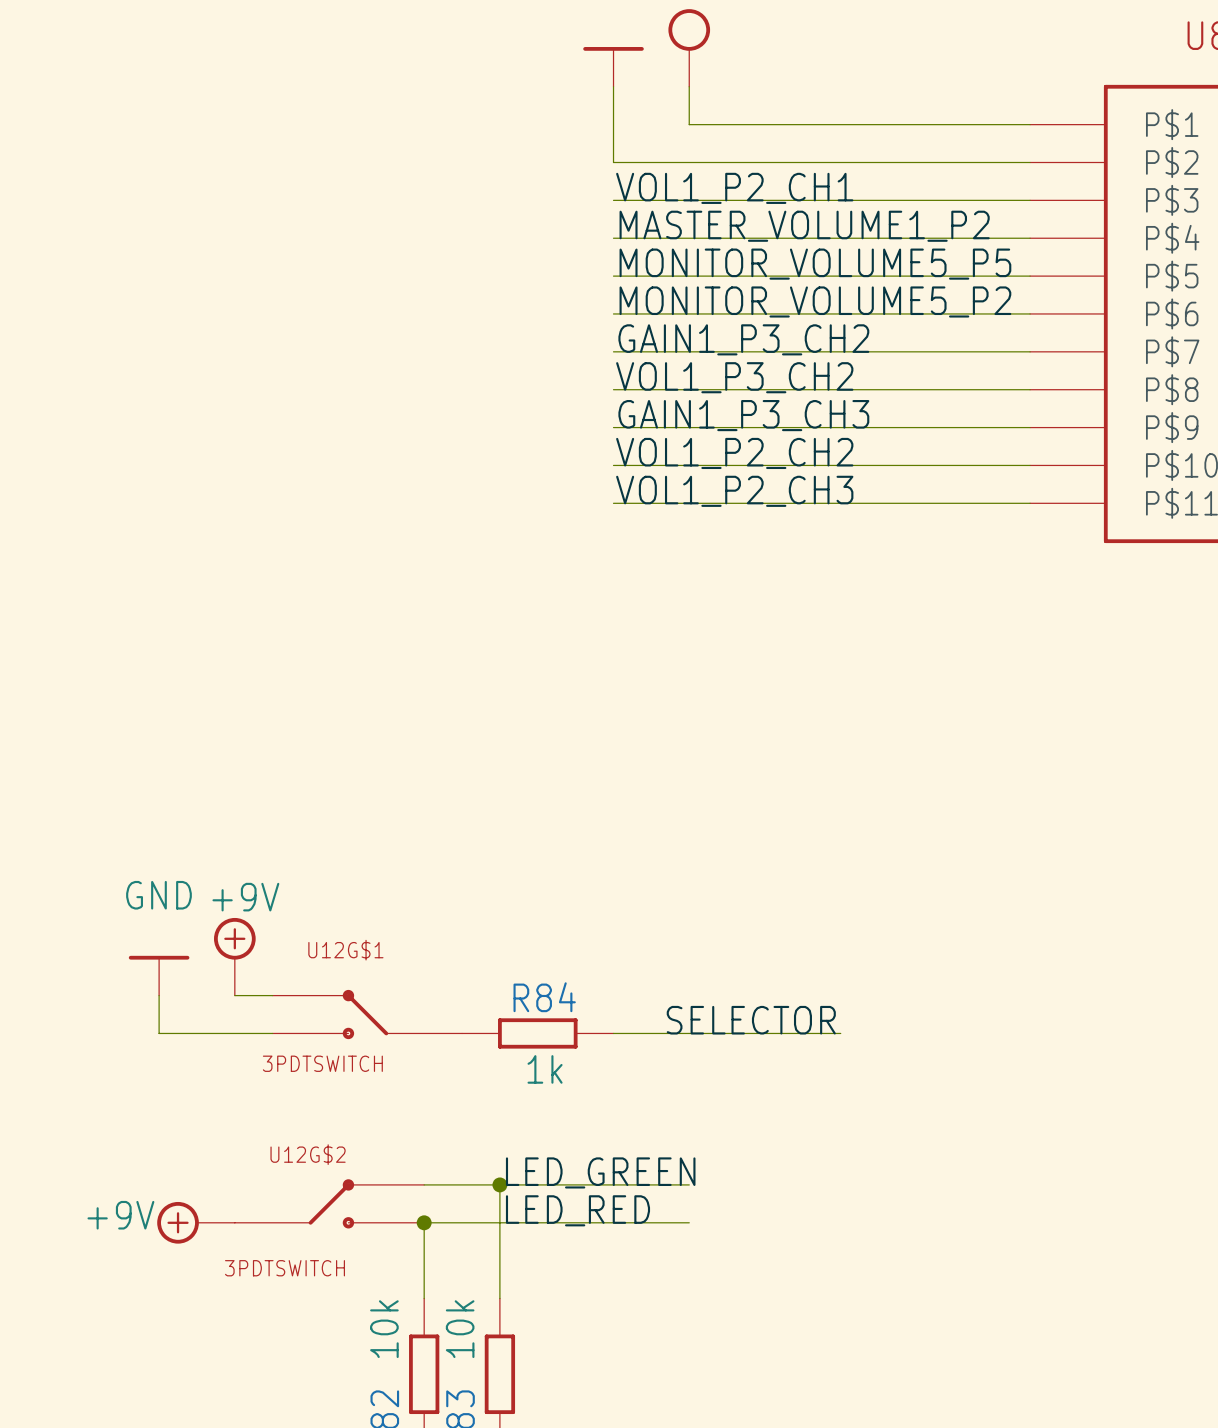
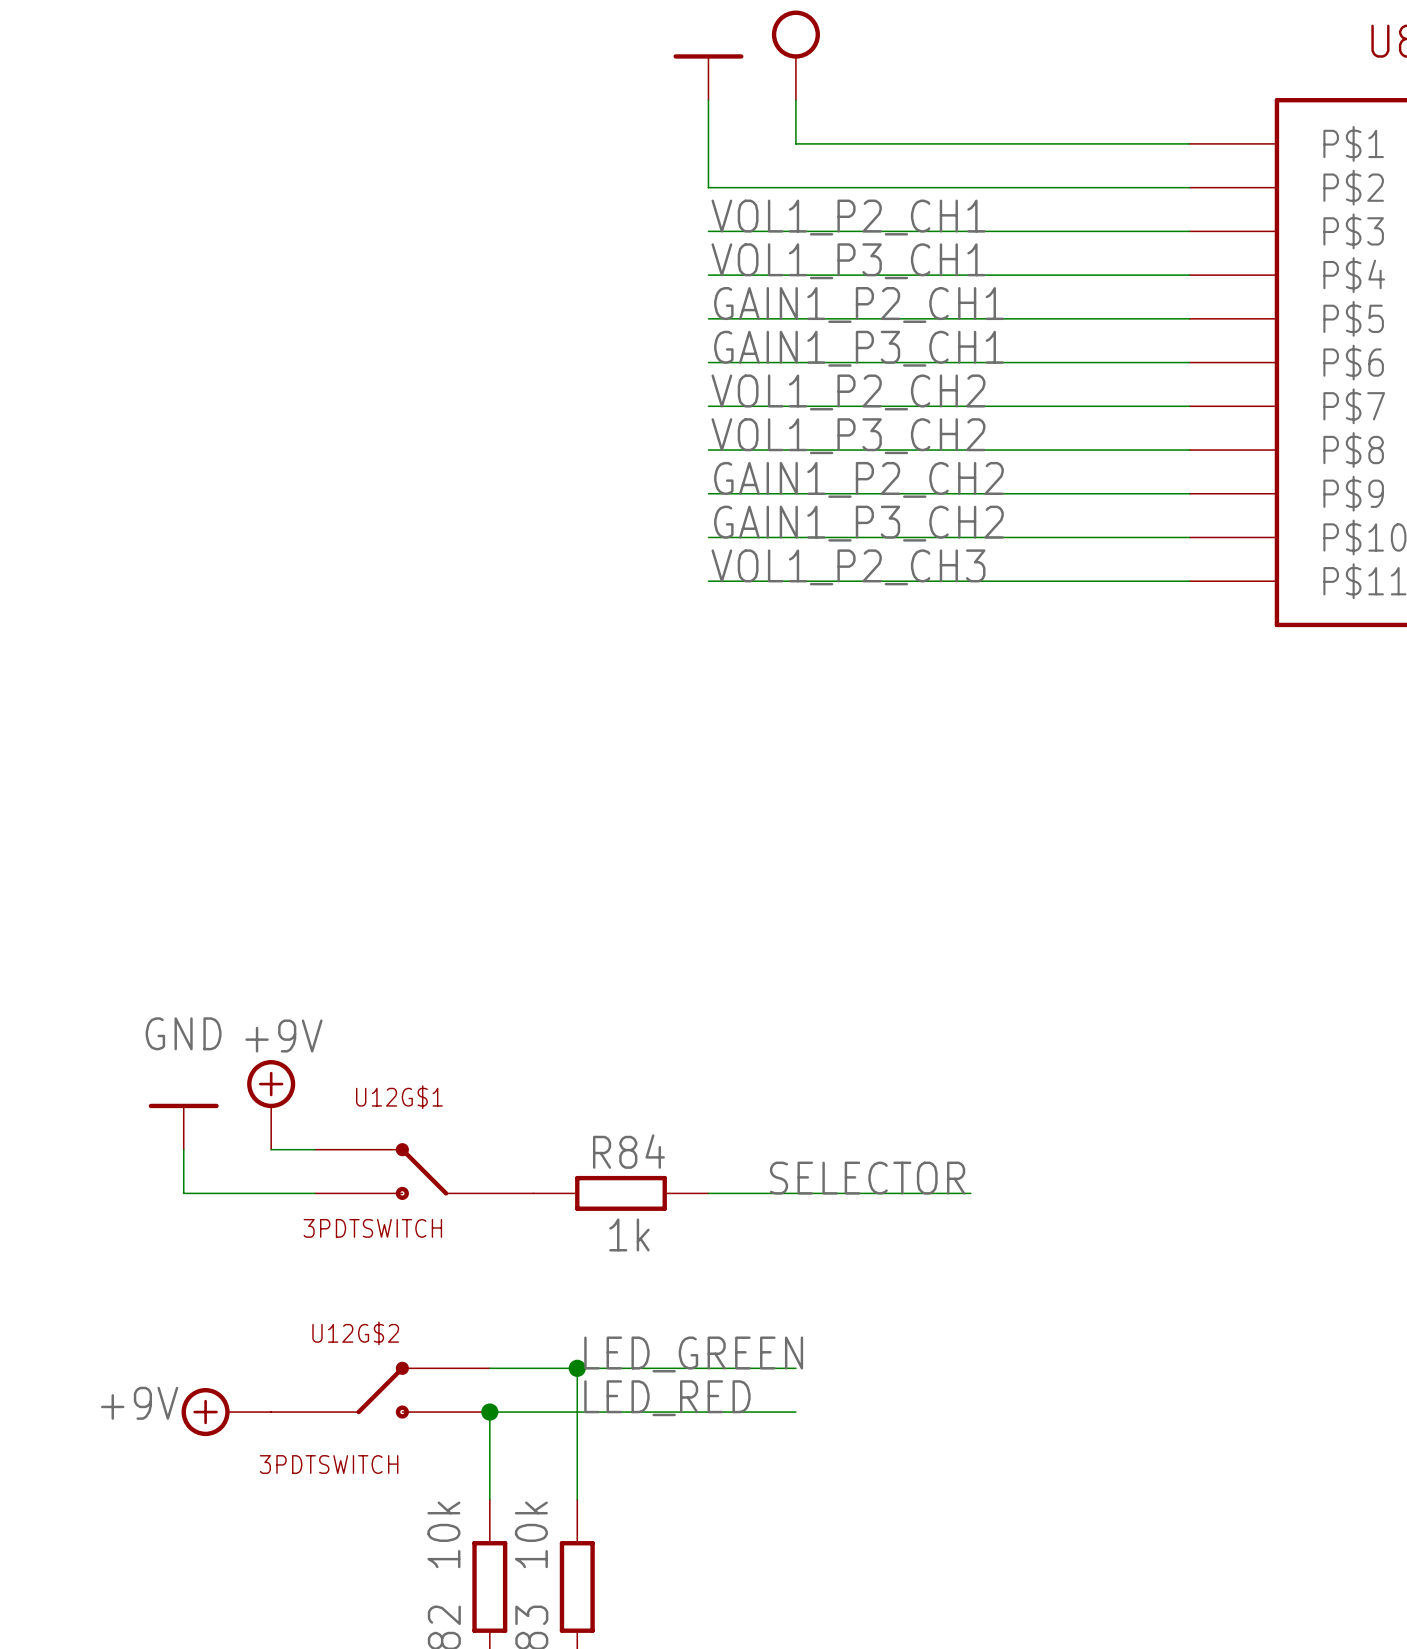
label: MASTER_VOLUME1_P2 (804, 226) -> VOL1_P3_CH1 (848, 261)
label: MONITOR_VOLUME5_P5 (815, 264) -> GAIN1_P2_CH1 (858, 304)
label: MONITOR_VOLUME5_P2 (815, 301) -> GAIN1_P3_CH1 (858, 348)
label: GAIN1_P3_CH2 (743, 339) -> VOL1_P2_CH2 (848, 392)
label: GAIN1_P3_CH3 (743, 415) -> GAIN1_P2_CH2 (858, 479)
label: VOL1_P2_CH2 (734, 453) -> GAIN1_P3_CH2 (858, 523)

